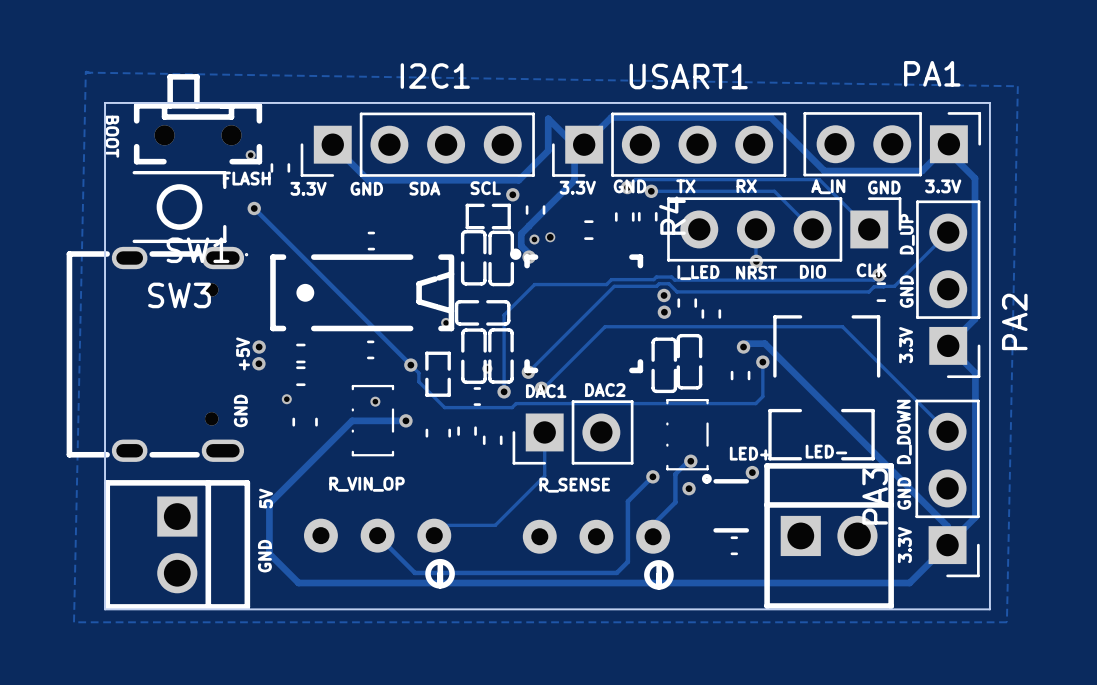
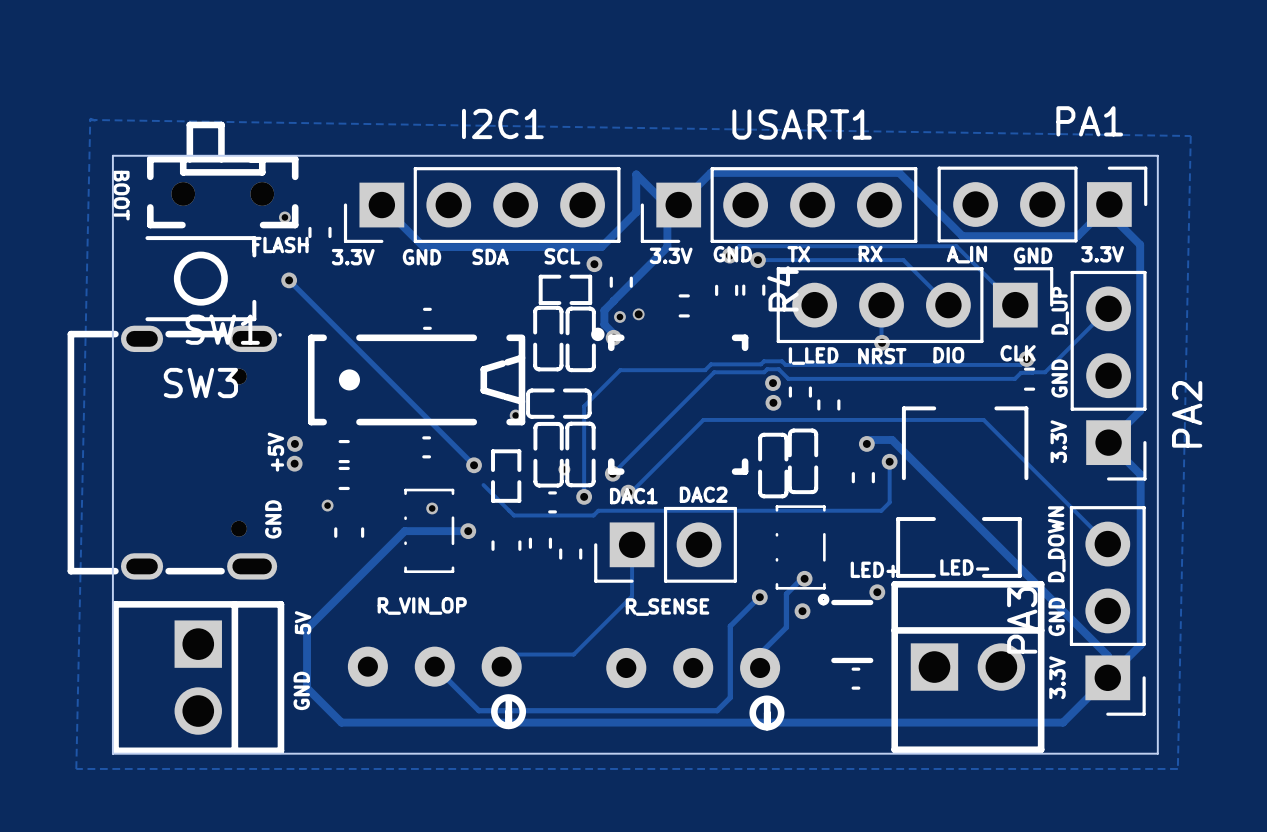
track: (410, 365) (418, 373) (418, 381) -> none

